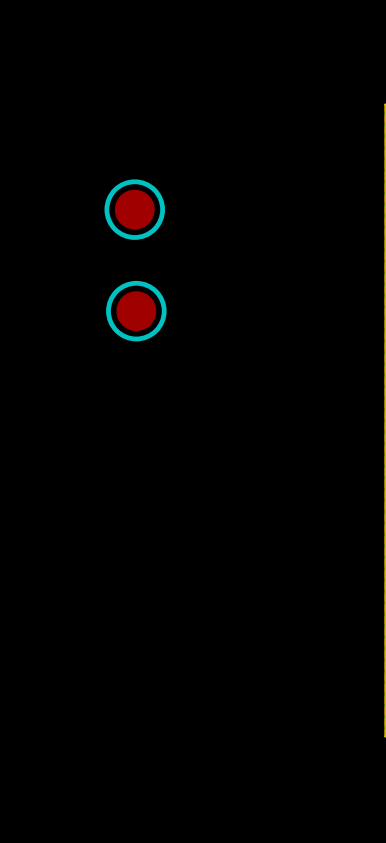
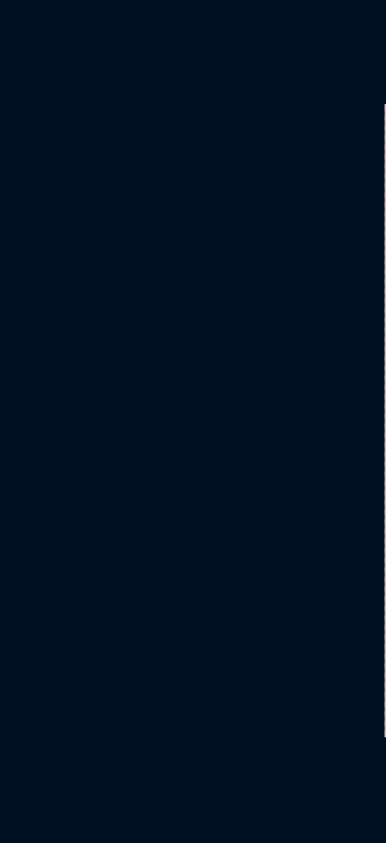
part: (134, 209) -> none
part: (136, 311) -> none

